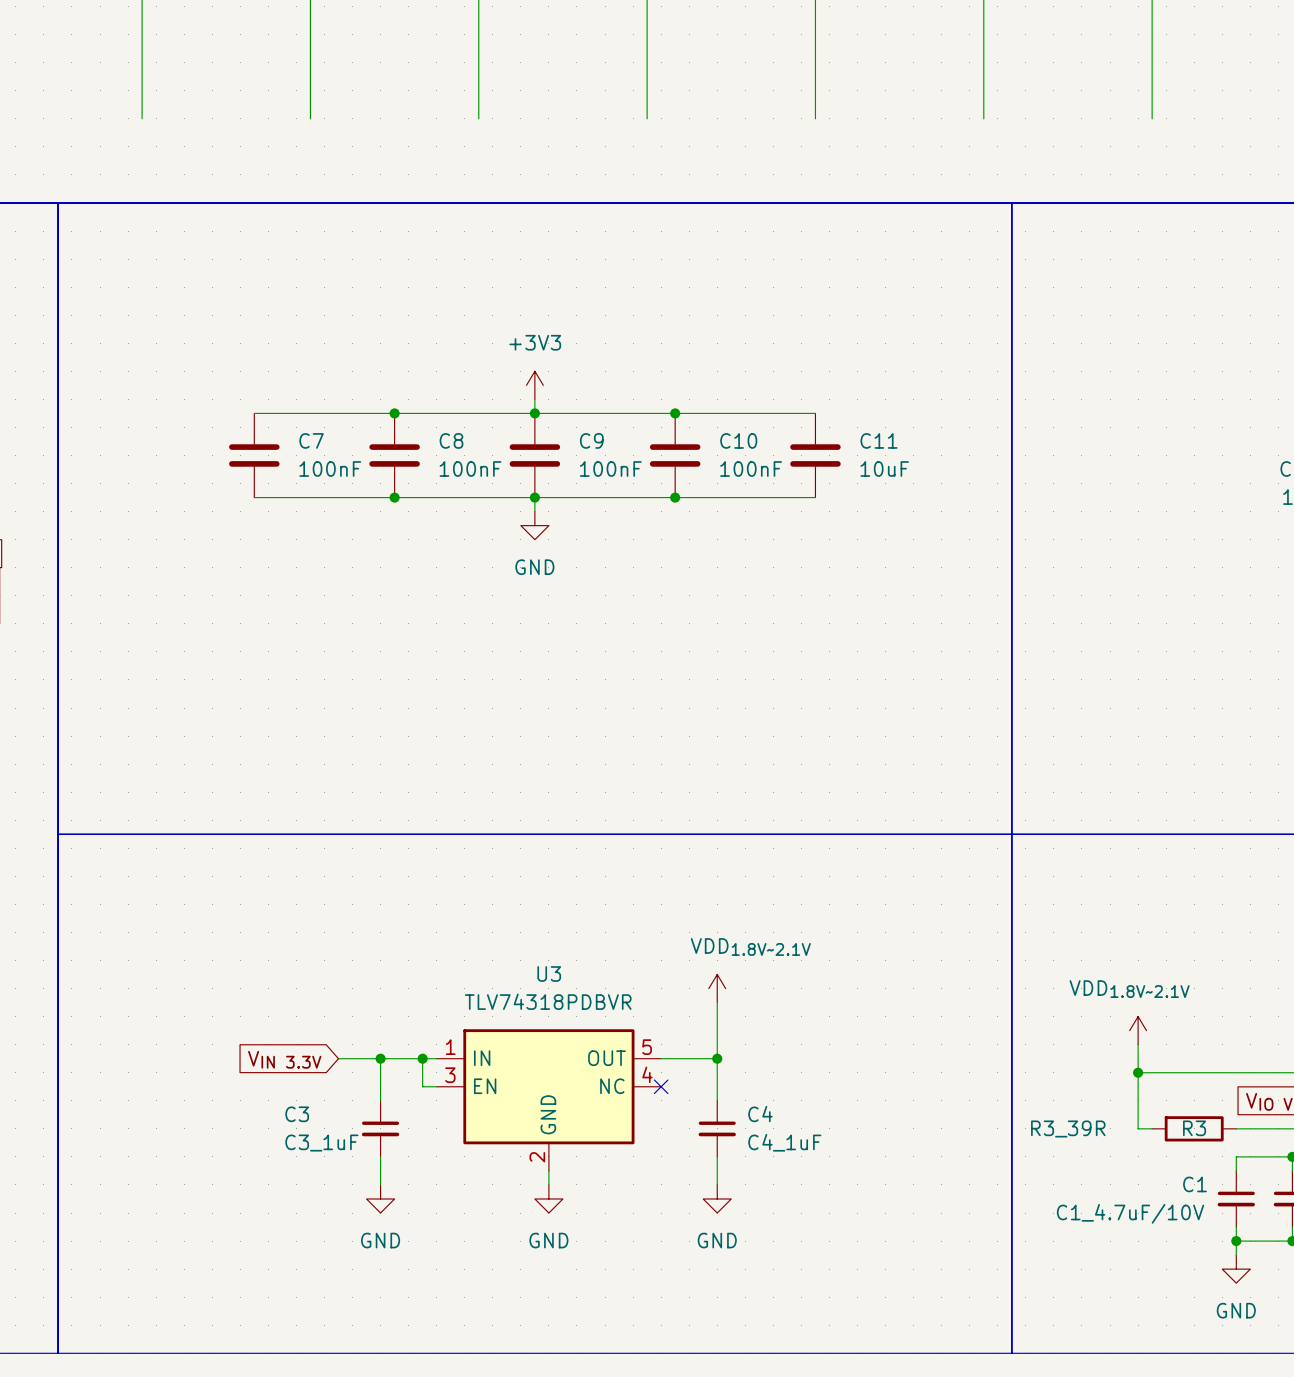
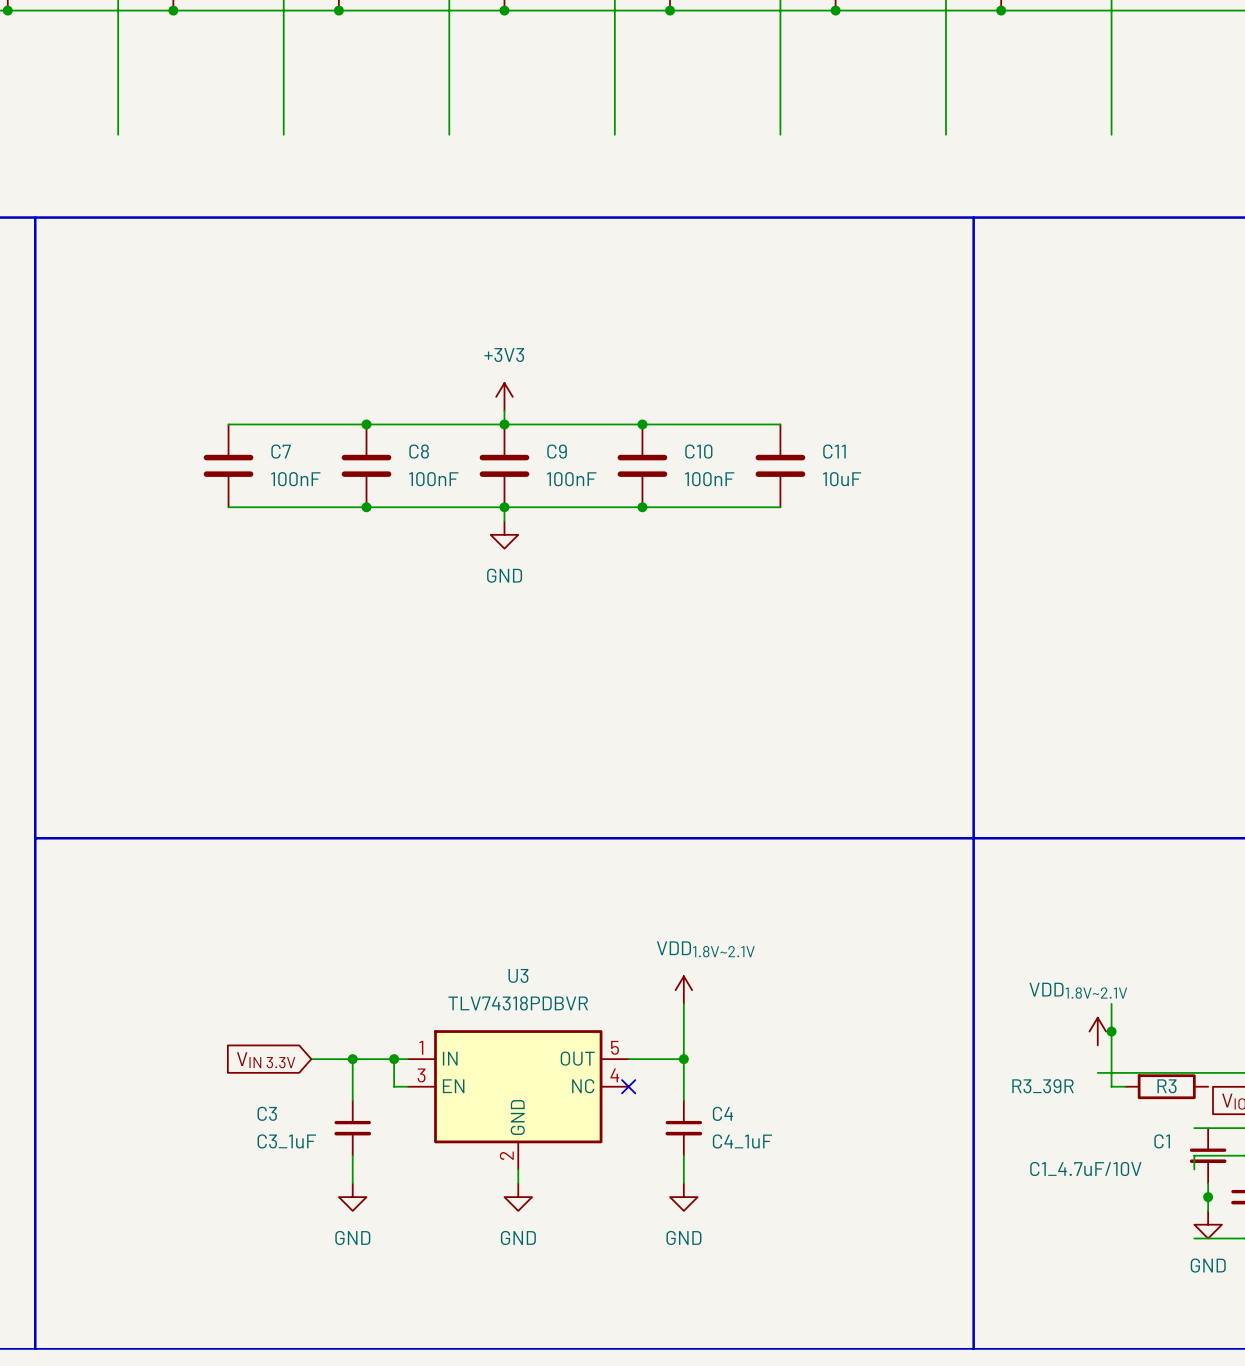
wire: (1138, 1044) (1138, 1128) (1152, 1128) -> (1111, 1003) (1111, 1086) (1125, 1086)
junction position: (1138, 1072) -> (1111, 1031)
R3 position: (1194, 1128) -> (1166, 1086)
C1 position: (1236, 1198) -> (1208, 1155)
wire: (1236, 1227) (1236, 1255) -> (1208, 1183) (1208, 1210)
junction position: (1236, 1241) -> (1208, 1197)
power symbol position: GND (1236, 1269) -> GND (1208, 1224)

